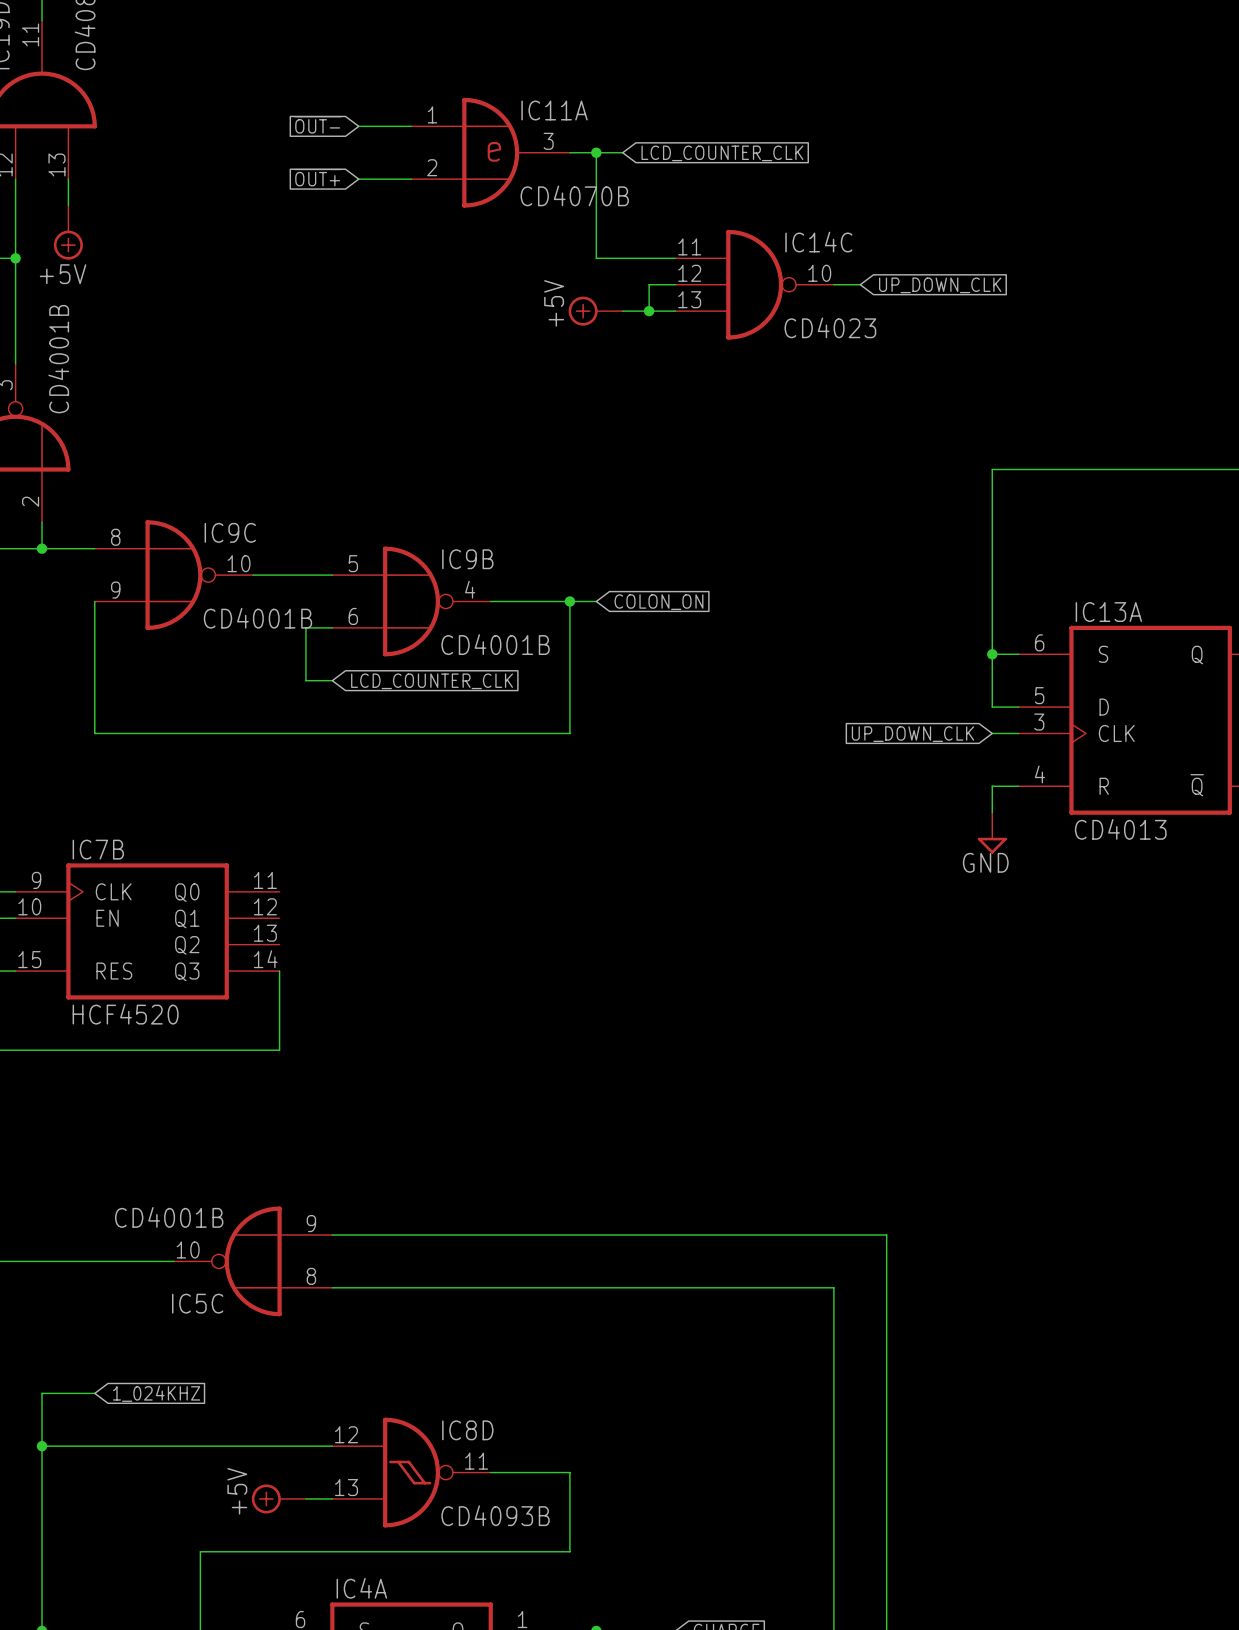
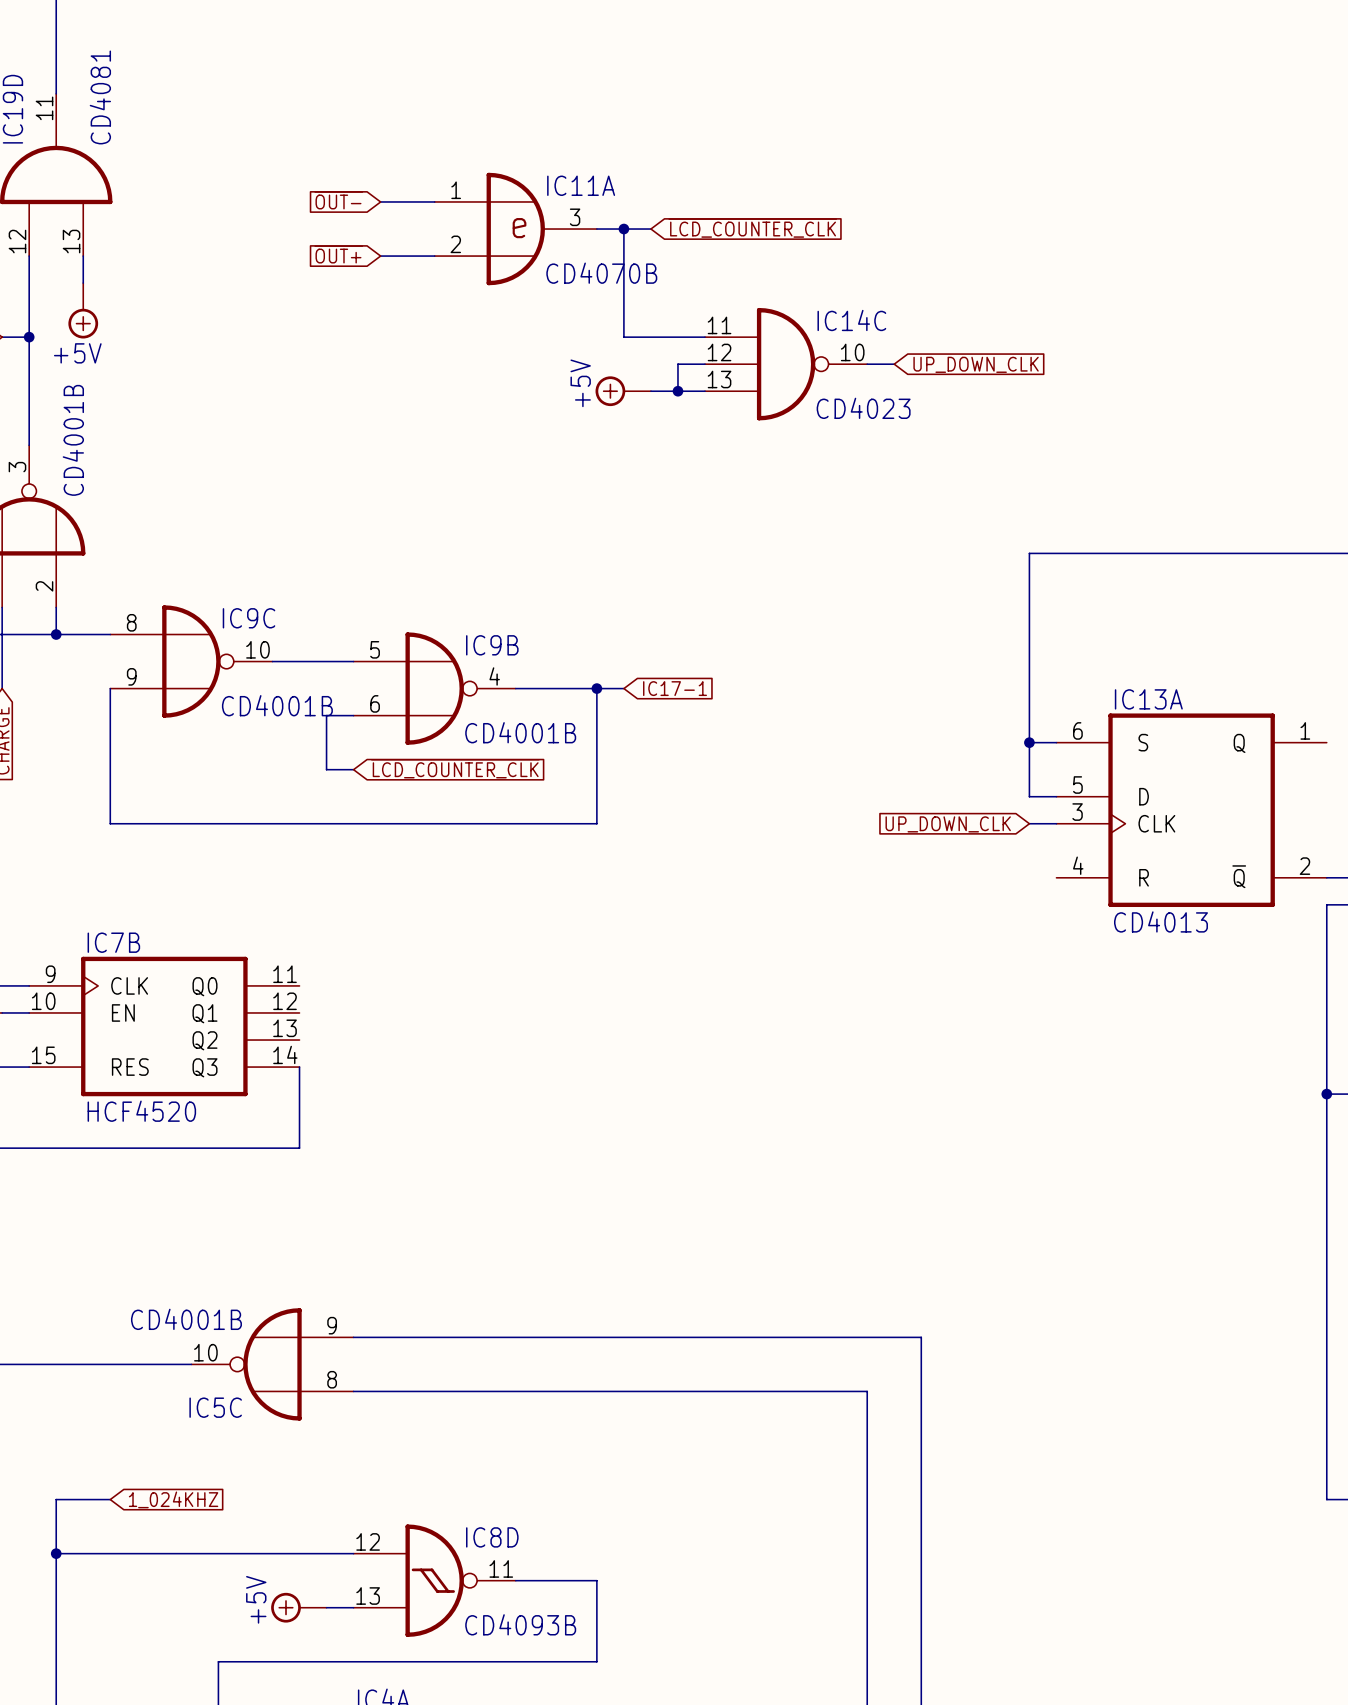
global label: LCD_COUNTER_CLK (722, 153) -> ~{LCD_COUNTER_CLK} (752, 228)
global label: COLON_ON (658, 602) -> IC17-1 (675, 688)
global label: LCD_COUNTER_CLK (432, 681) -> ~{LCD_COUNTER_CLK} (455, 768)
wire: (1018, 786) (992, 786) (992, 812) -> none
power symbol: GND (992, 833) -> none

